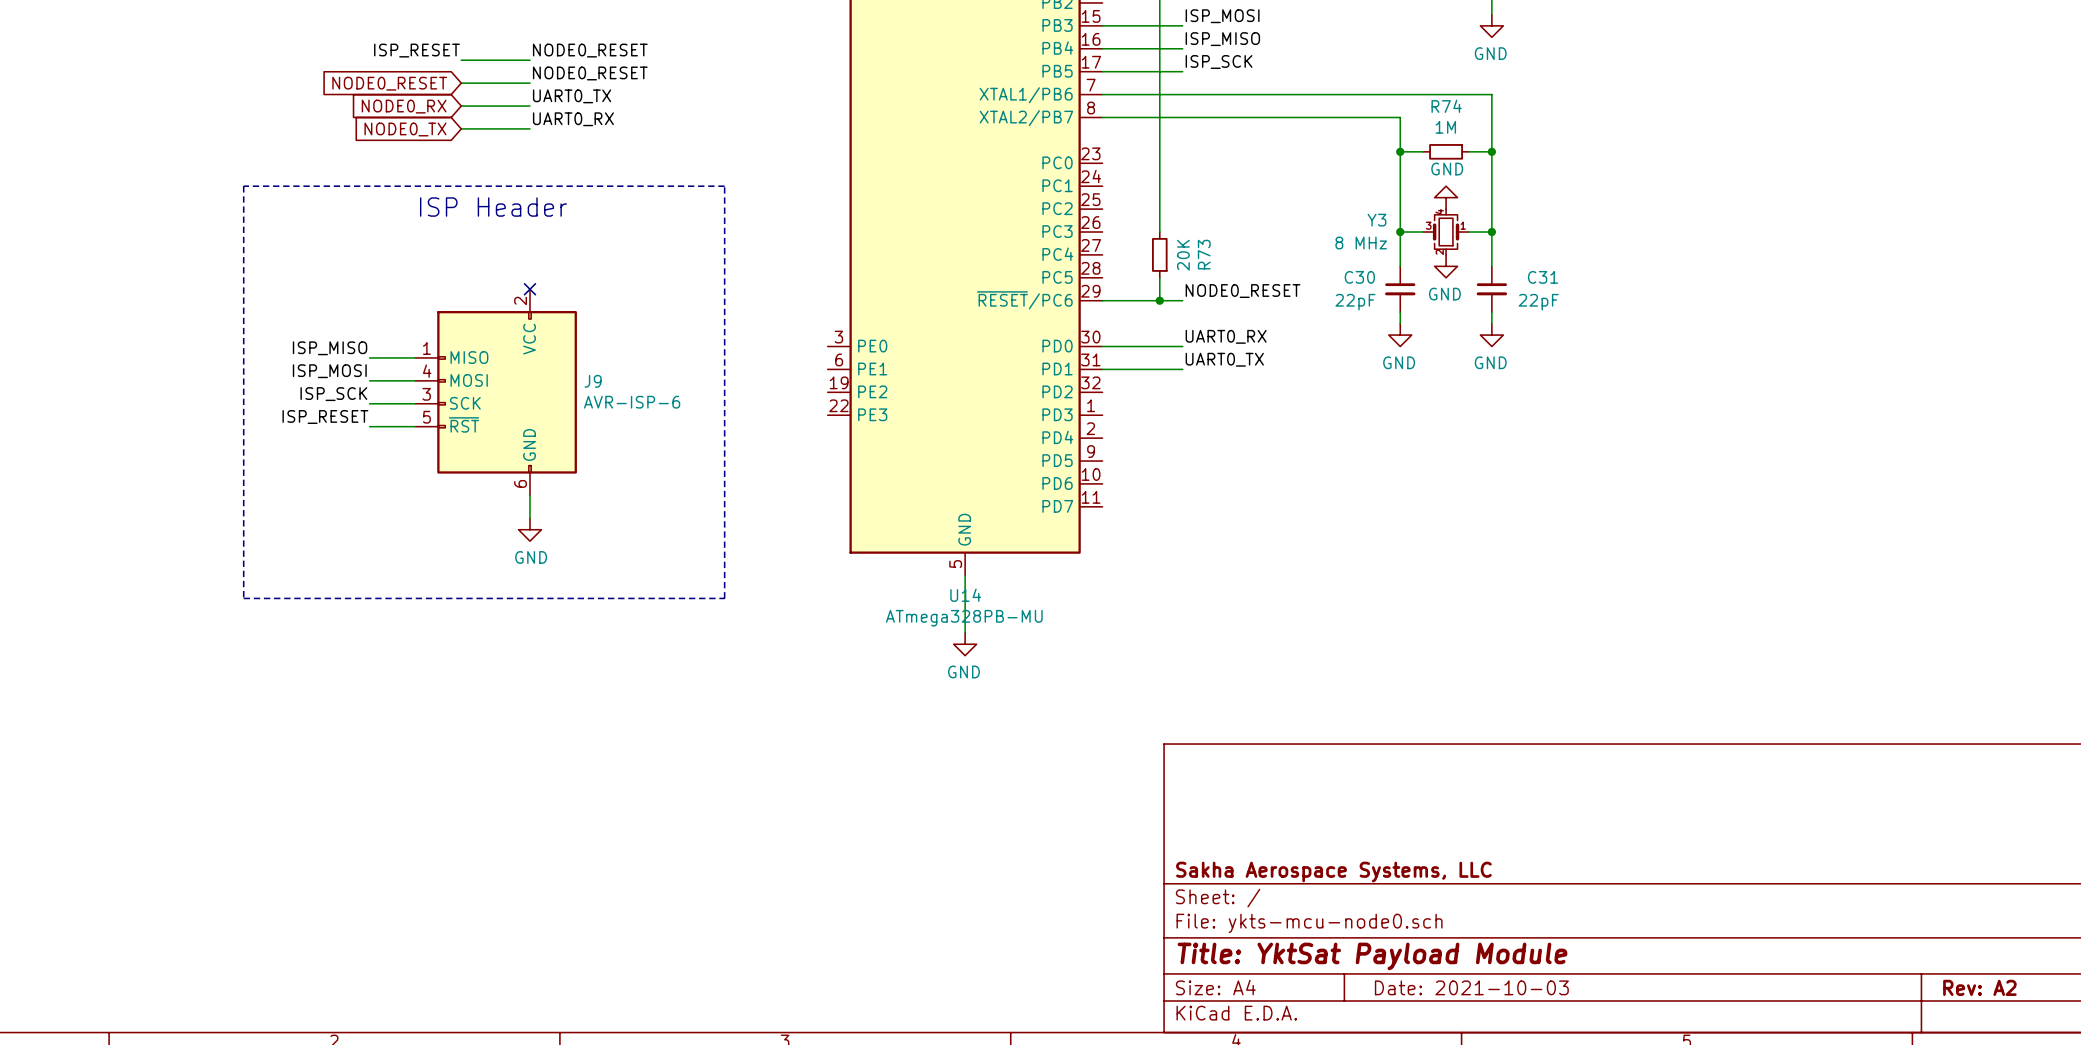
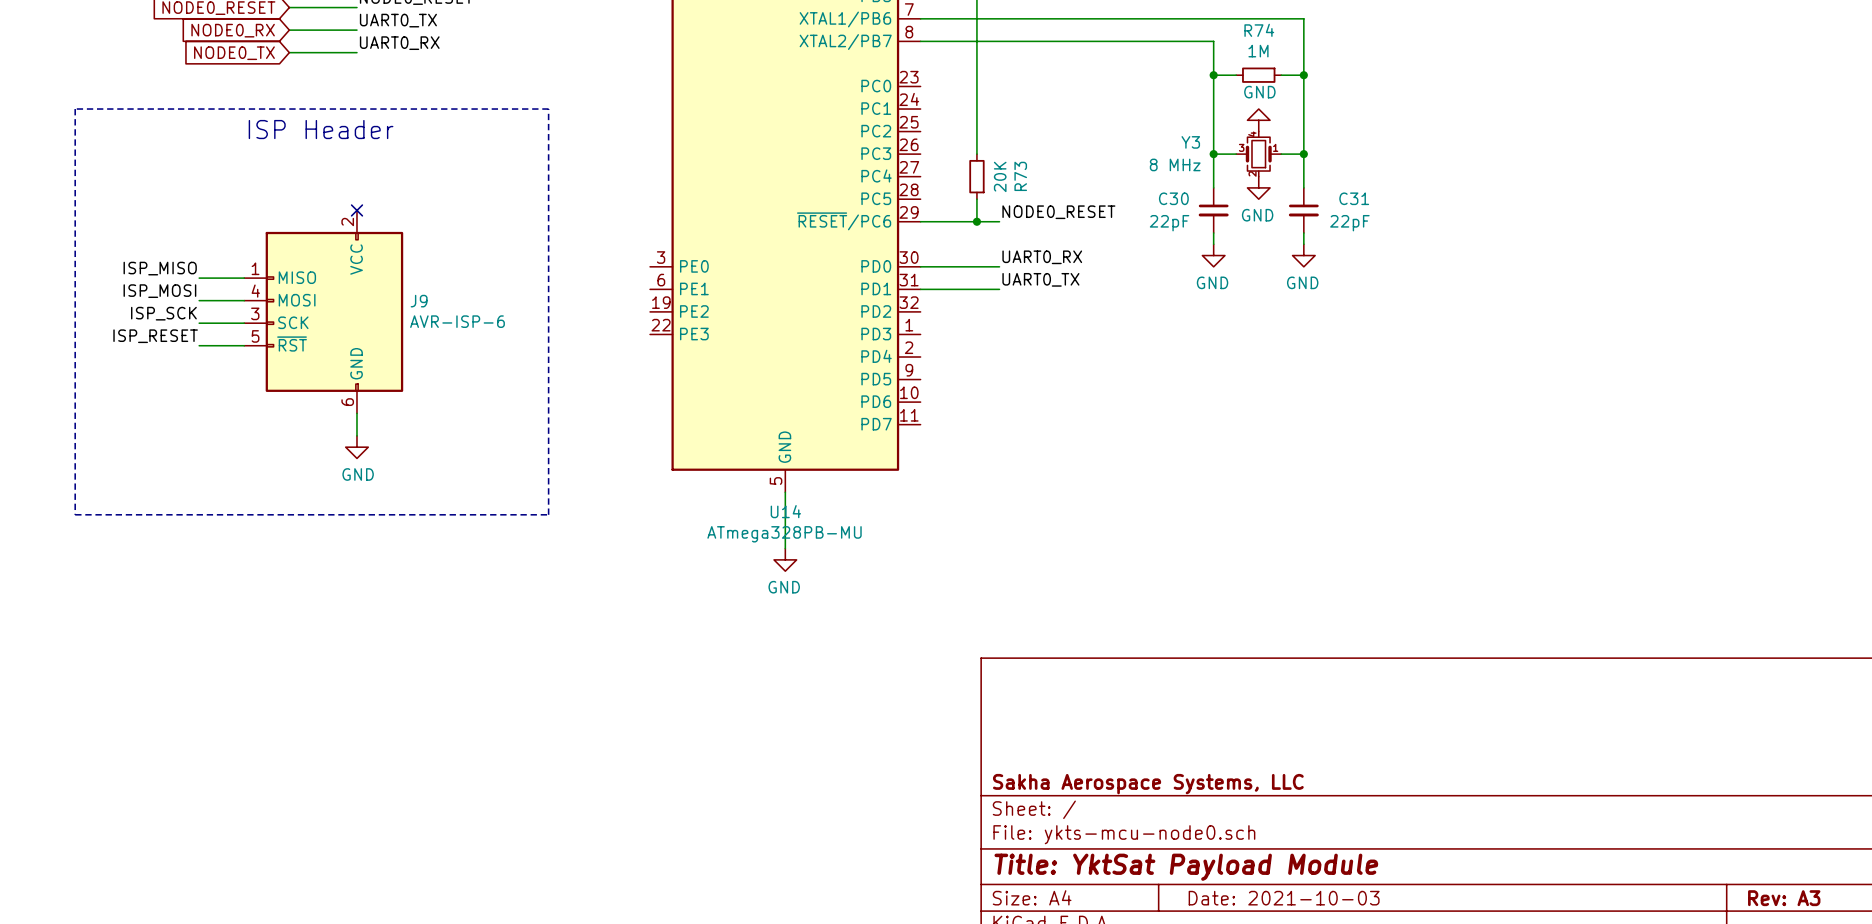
title block: Rev: A2 (1979, 987) -> Rev: A3 (1784, 898)

